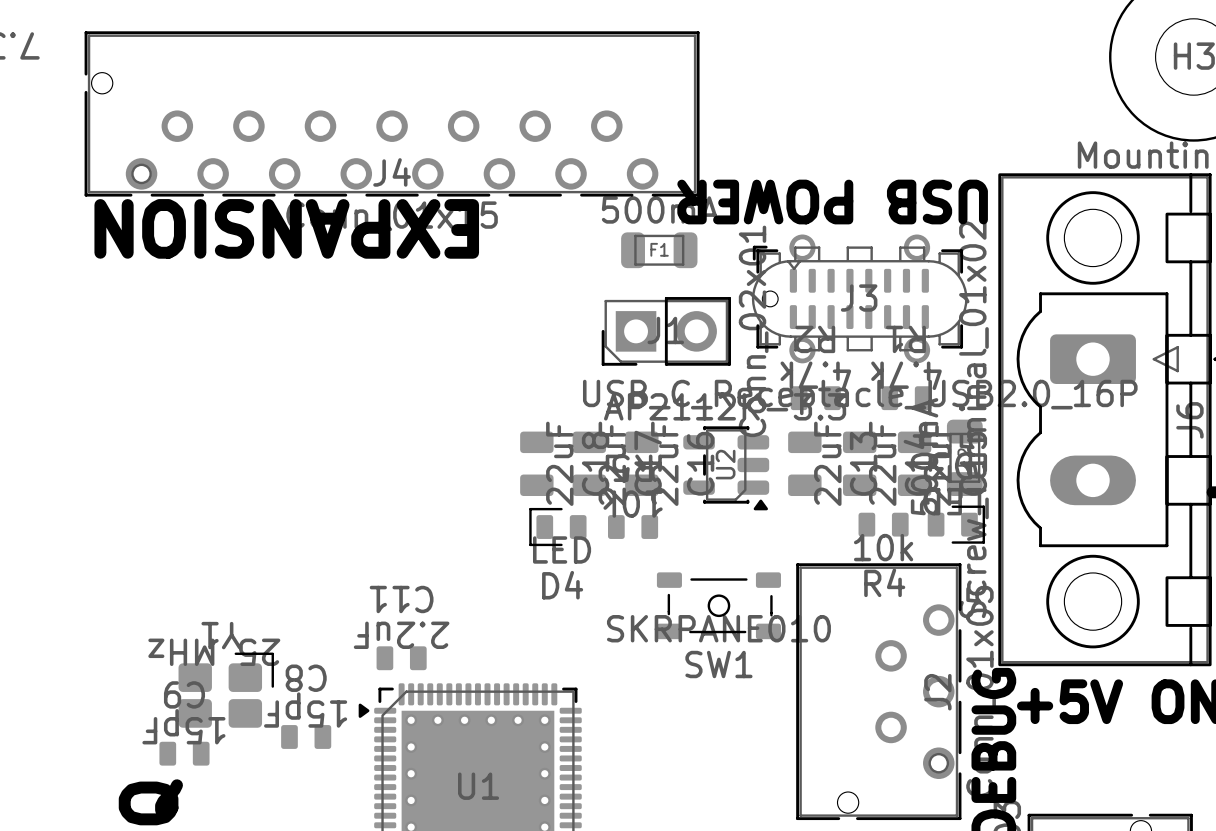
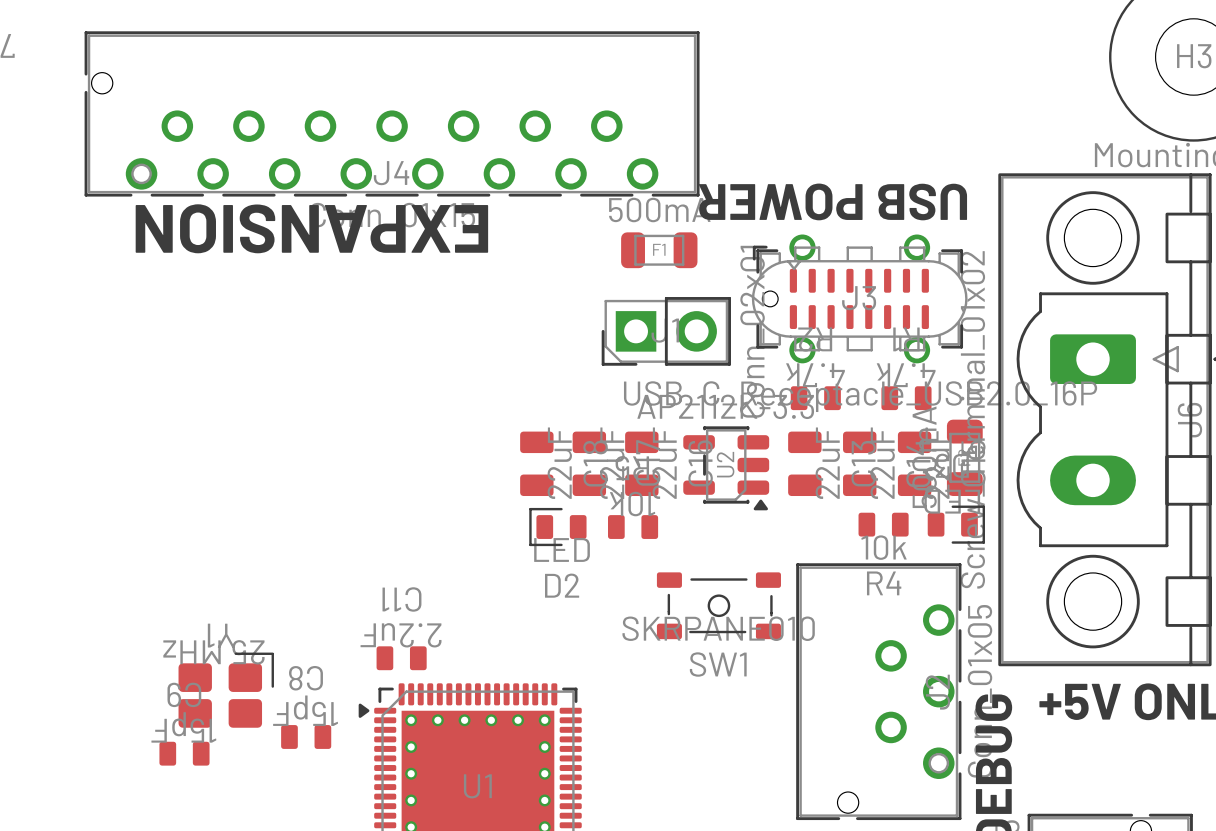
D4 name: D4 (562, 585) -> D2 (562, 585)

